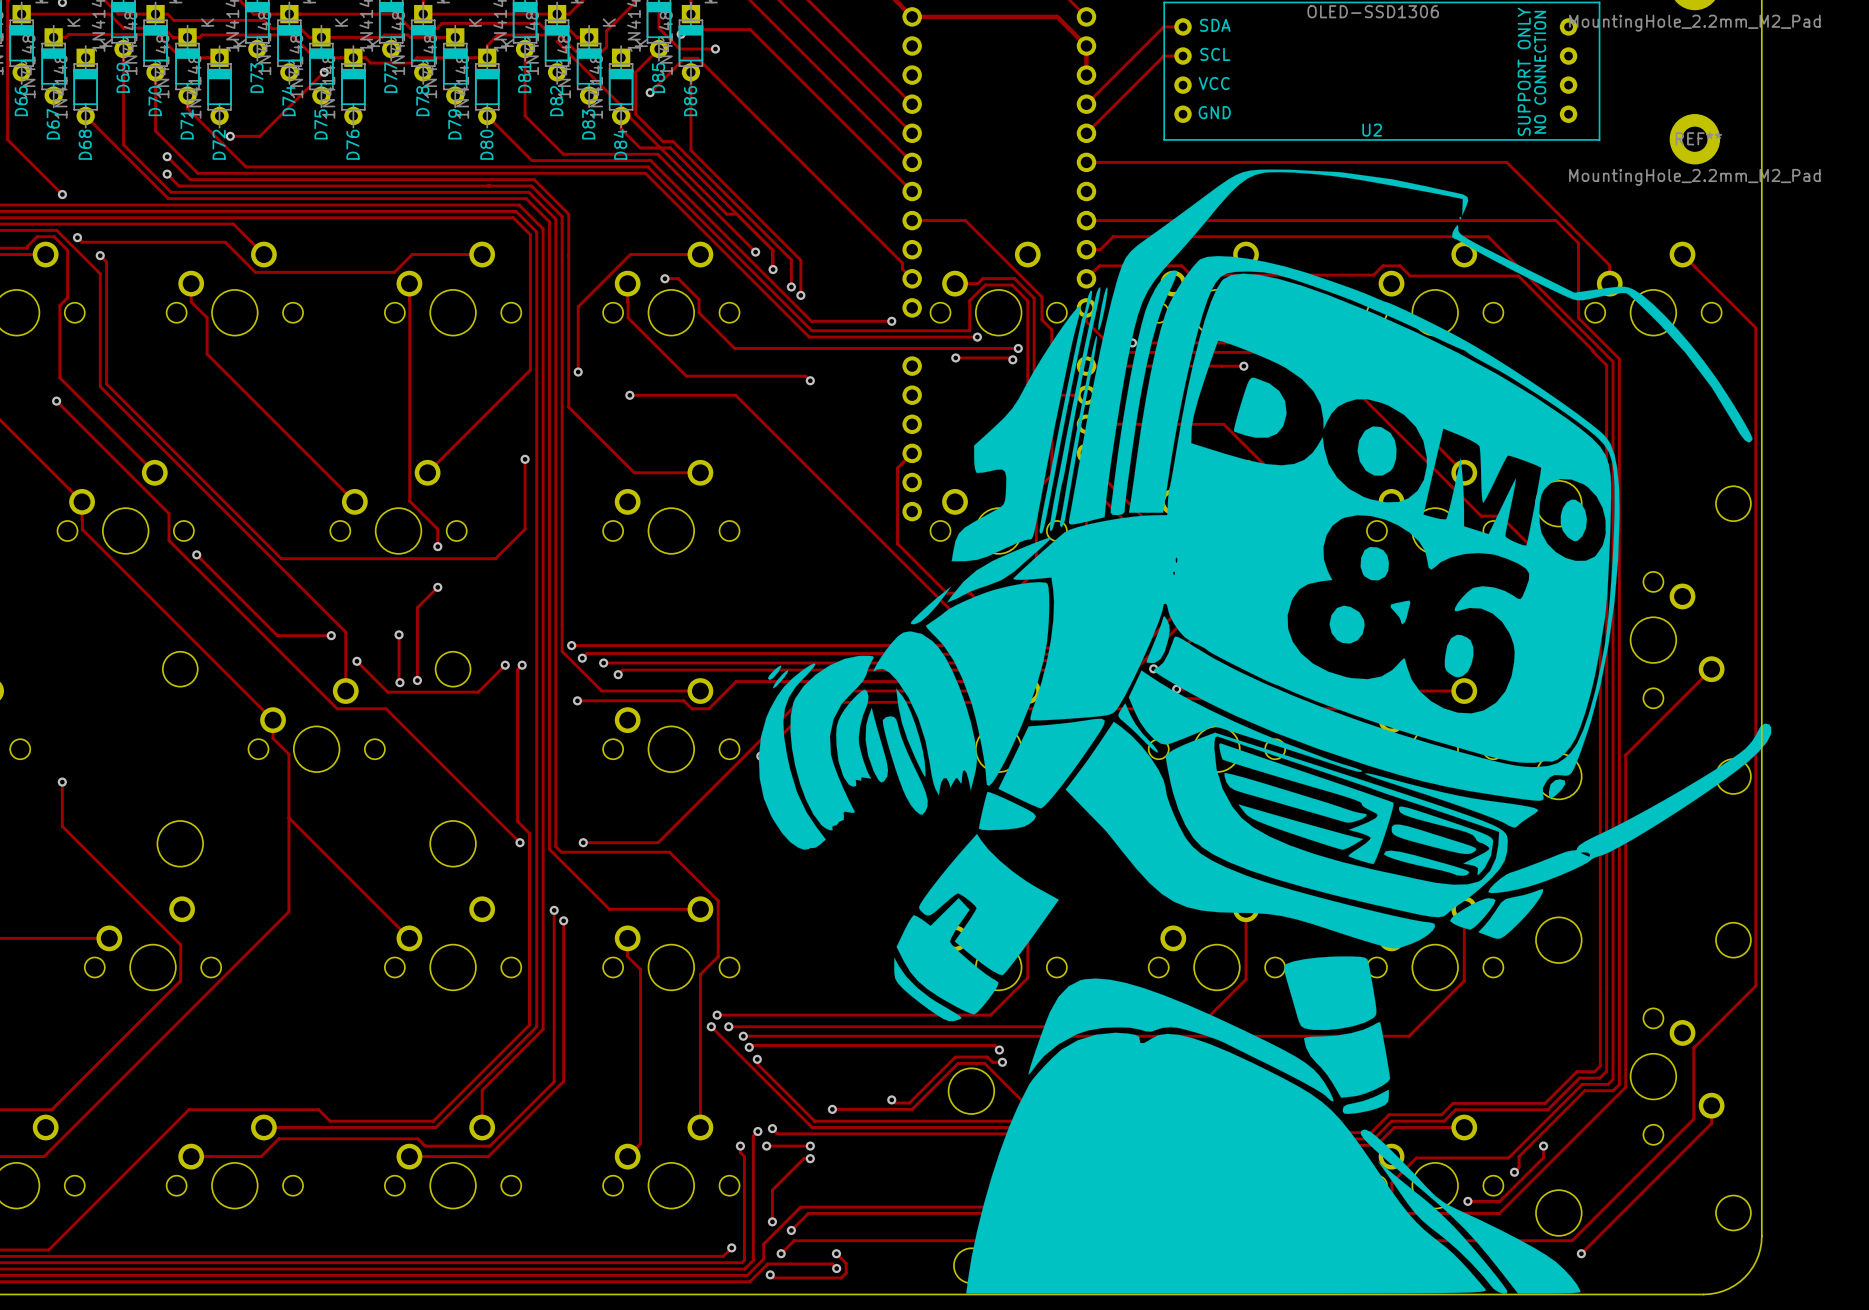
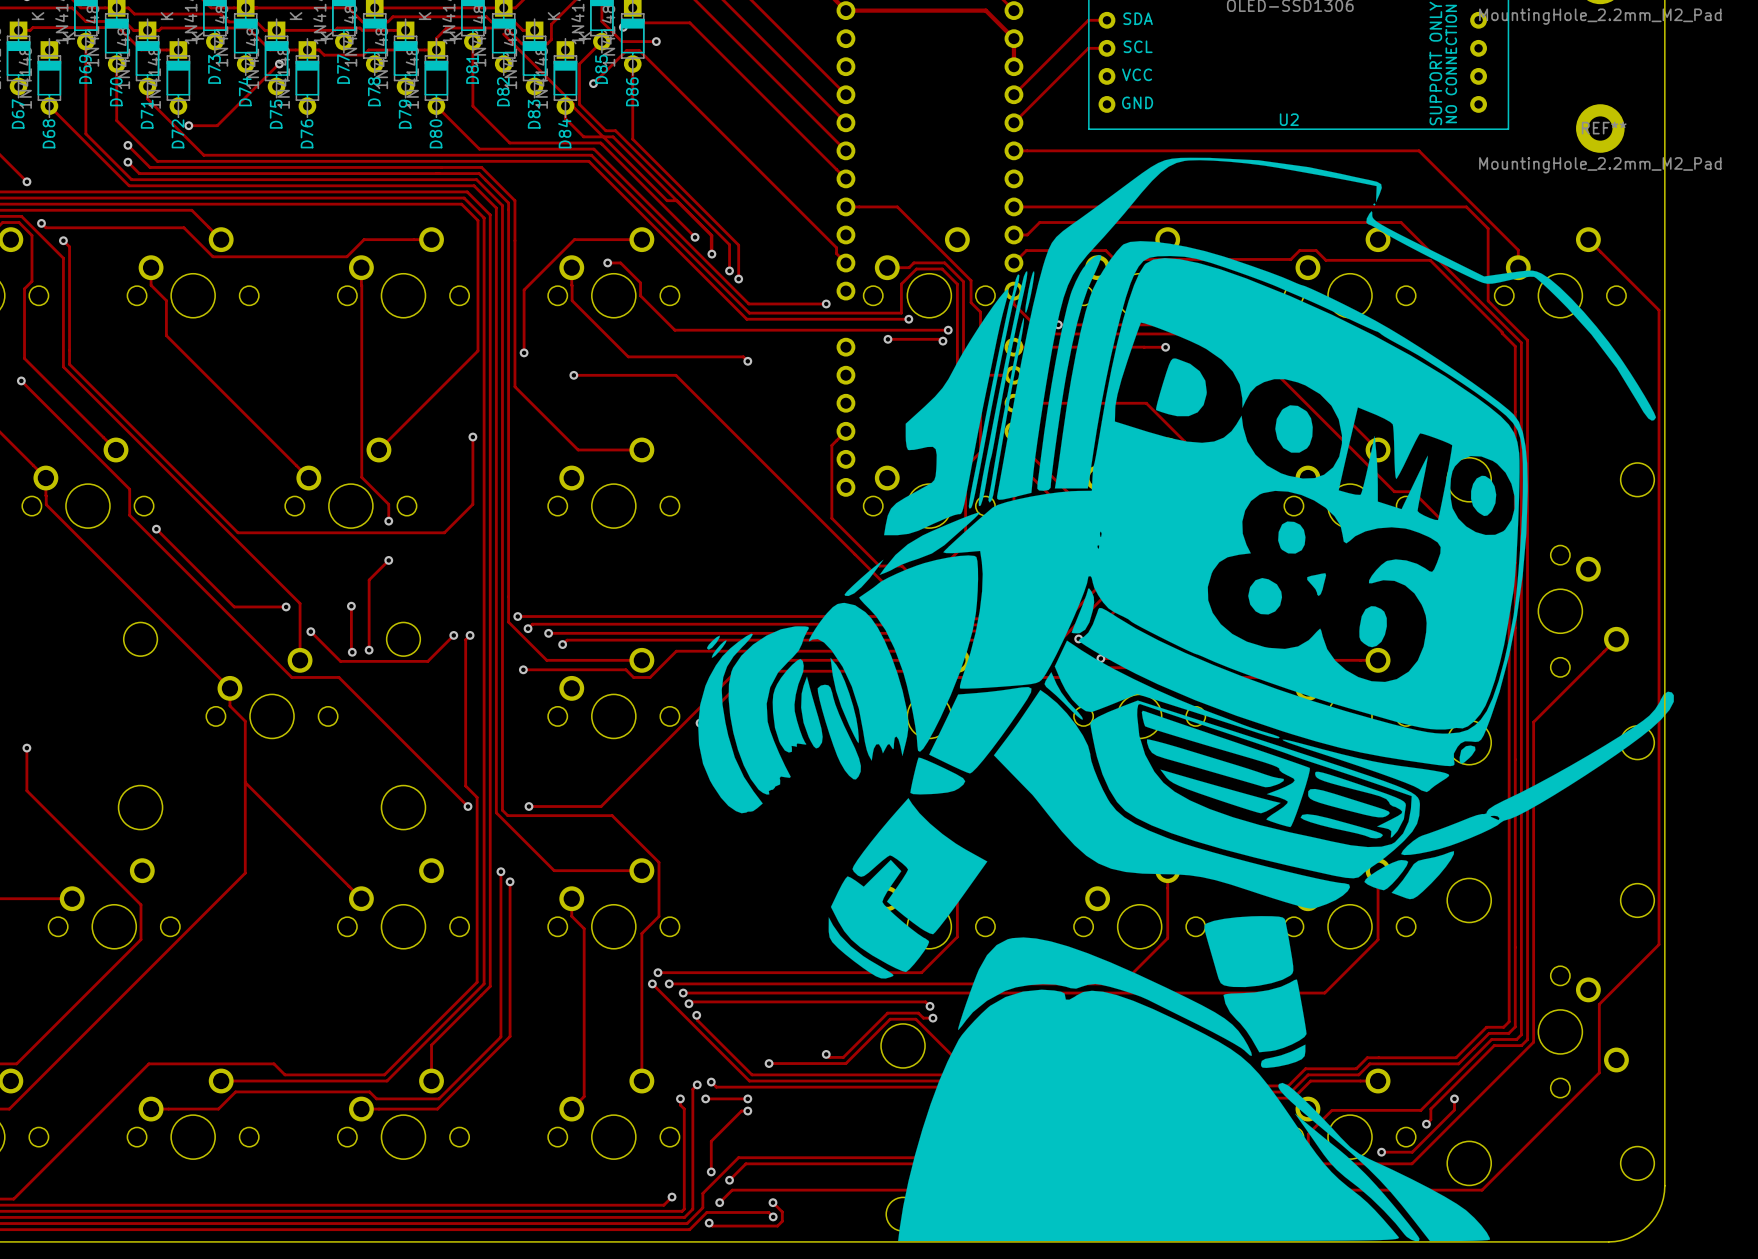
track: (1711, 1105) (1711, 1123) (1581, 1253) -> none
via: (1581, 1253) -> none

